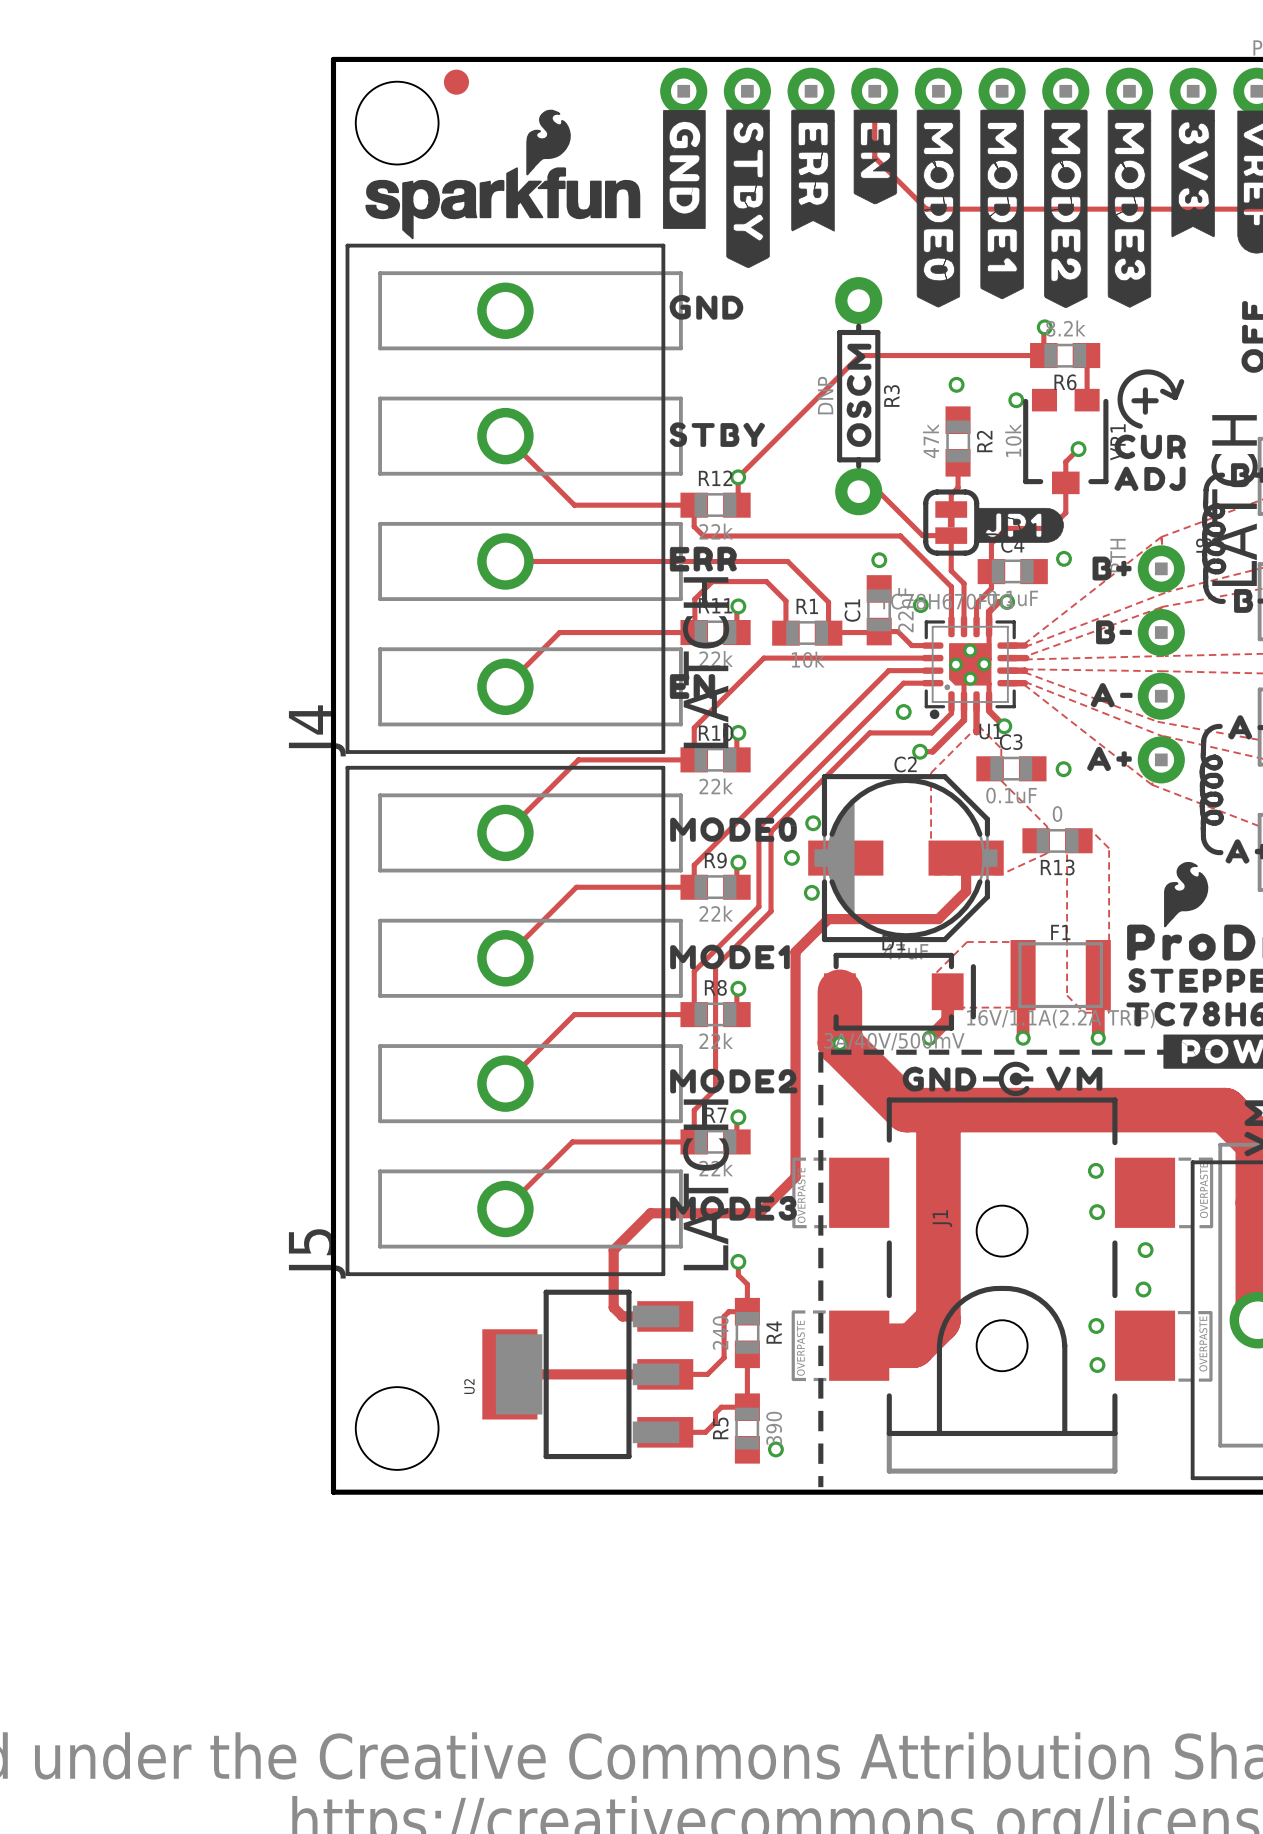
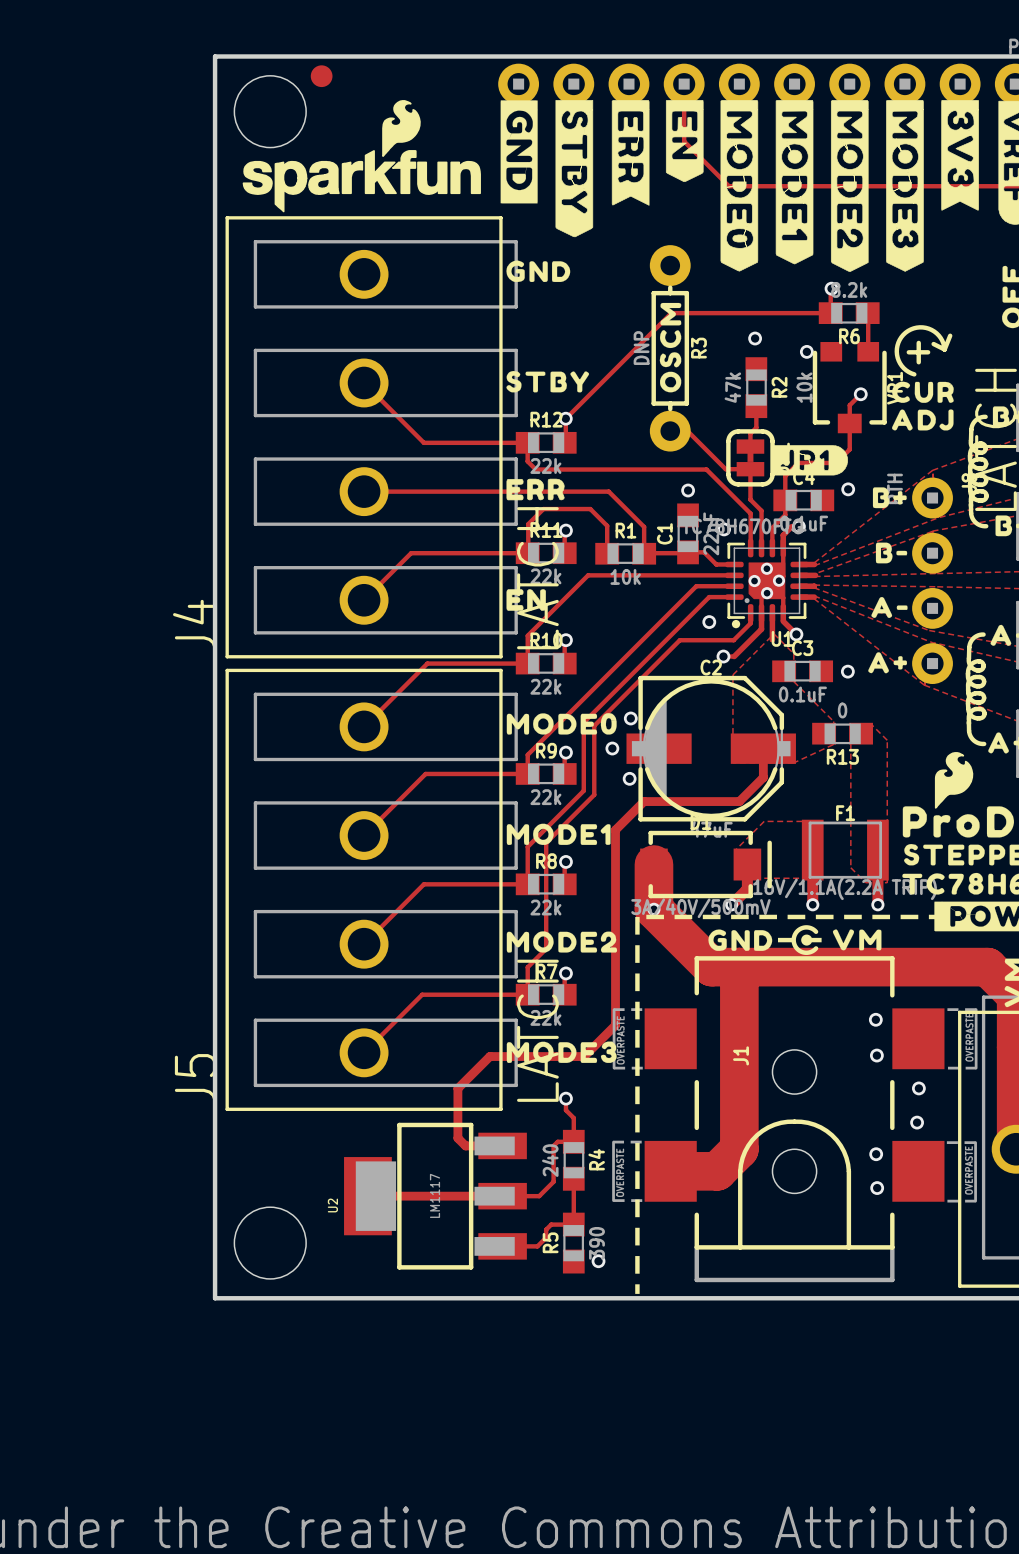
U2 value: none -> LM1117 (434, 1195)

